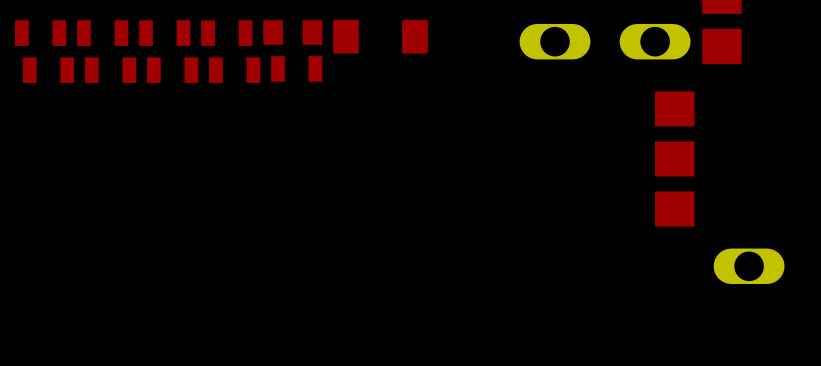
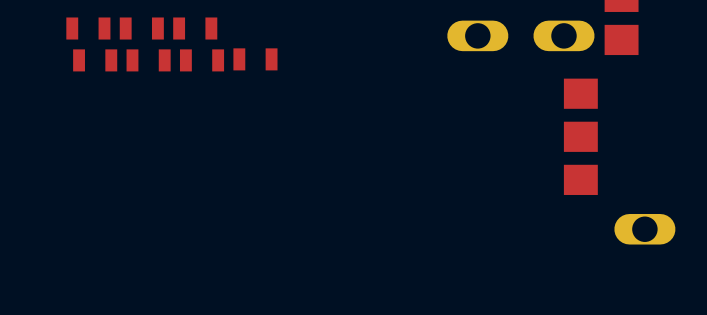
part: (292, 32) -> none
part: (40, 33) -> none
part: (380, 36) -> none
part: (48, 70) -> none

